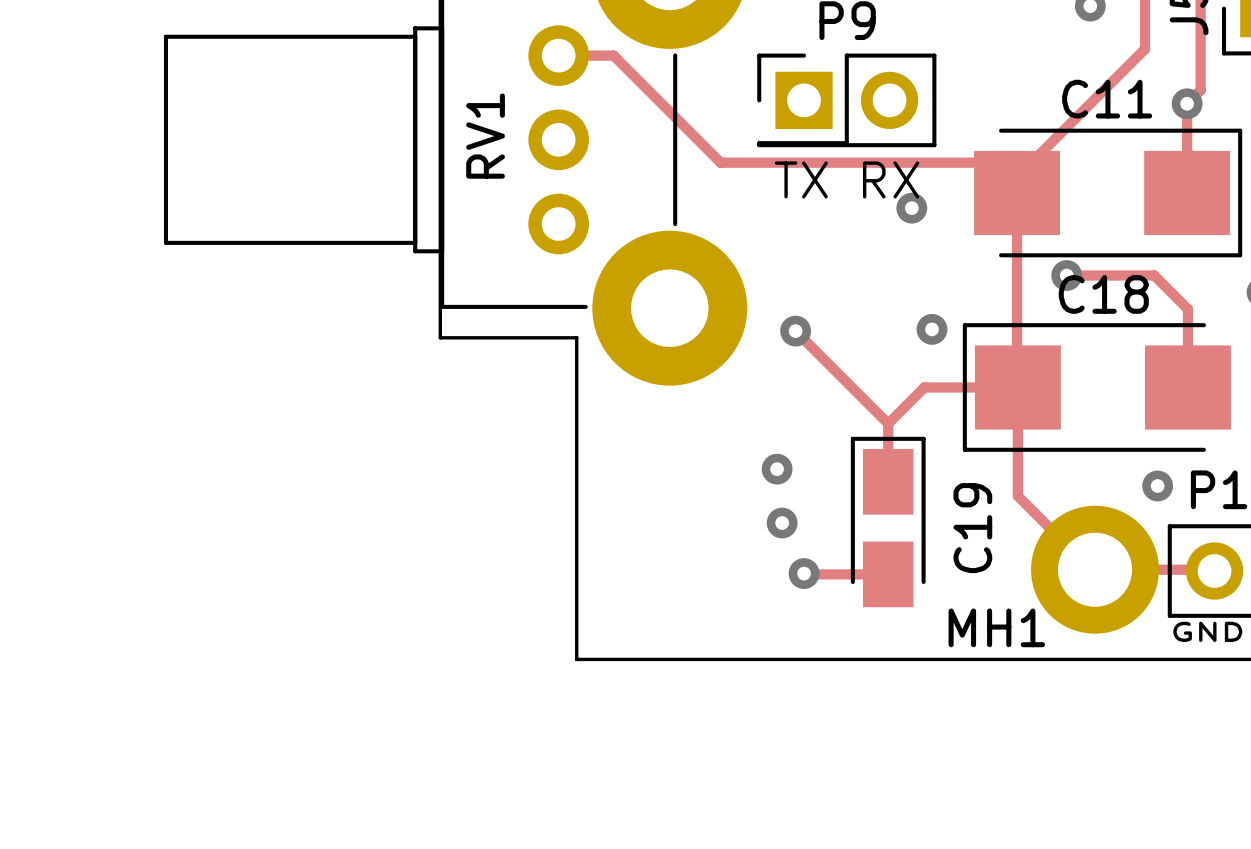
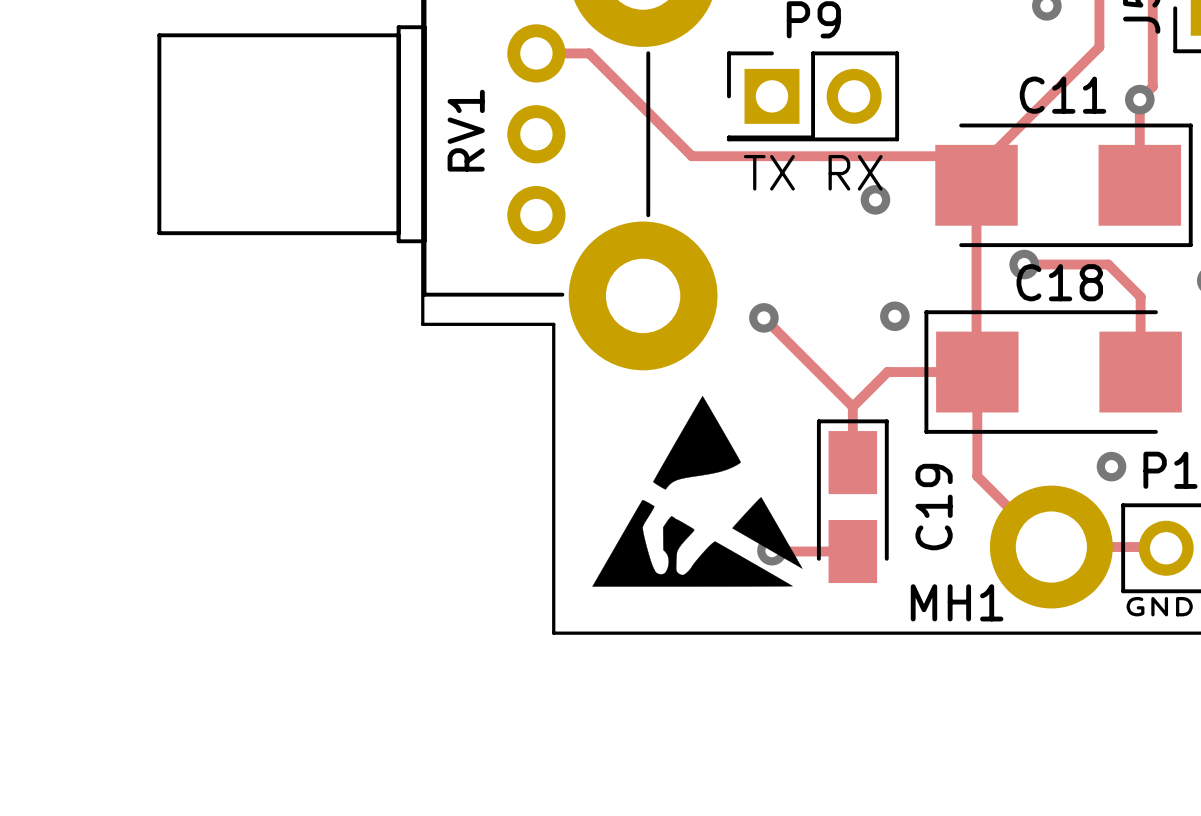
drawing: none -> [592, 396, 803, 587]
via: (777, 469) -> none
via: (782, 523) -> none

